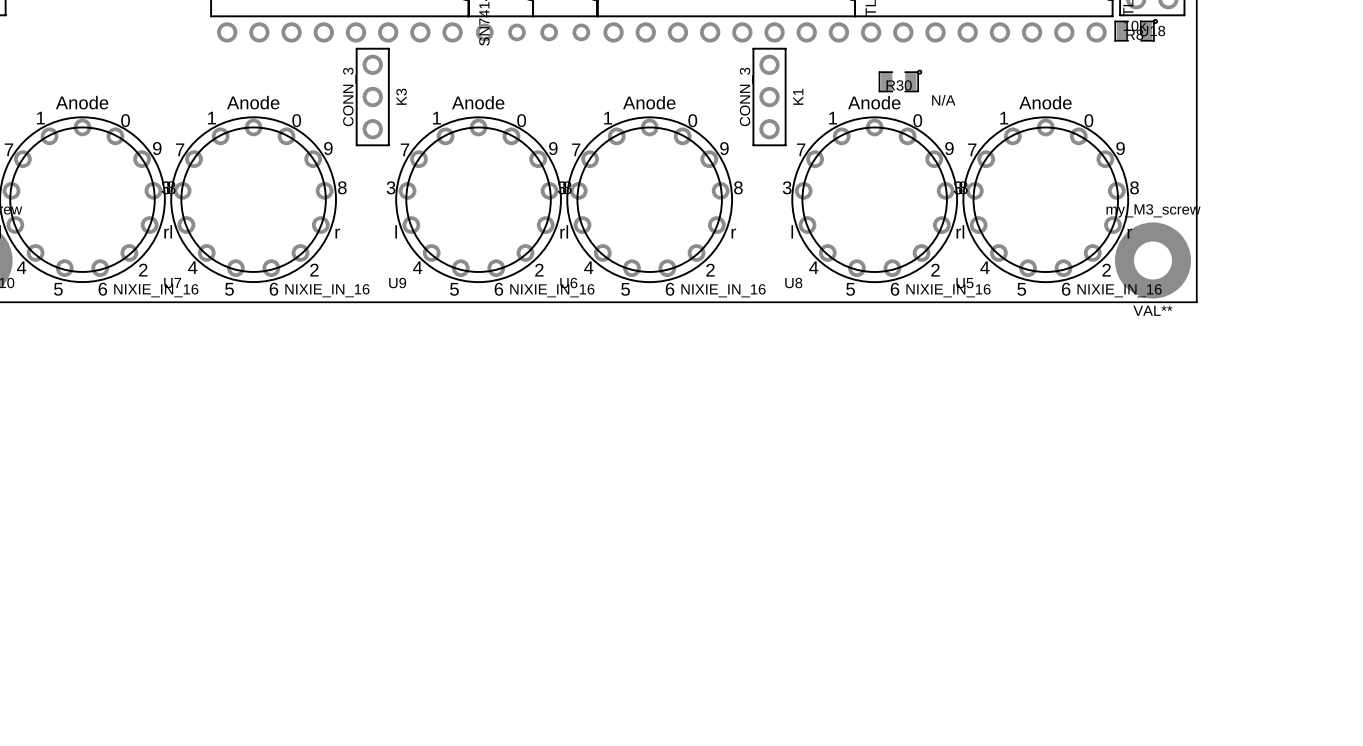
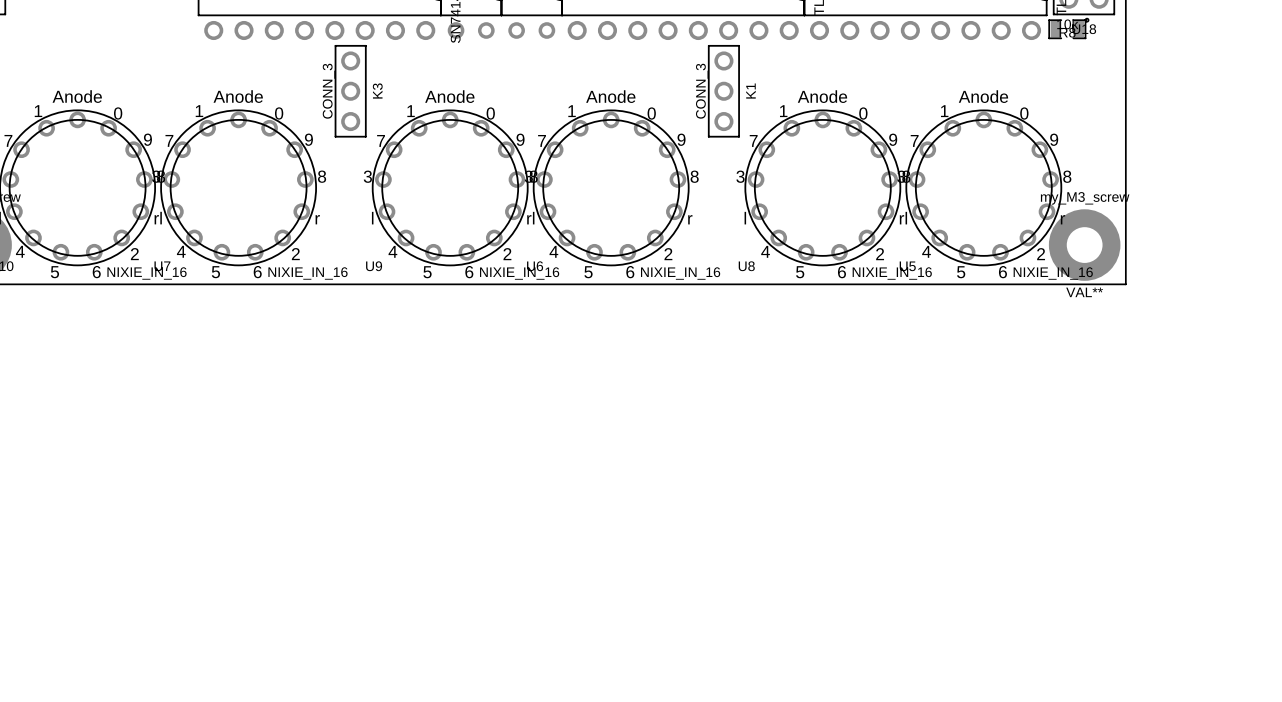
R30: N/A (900, 81) -> none

